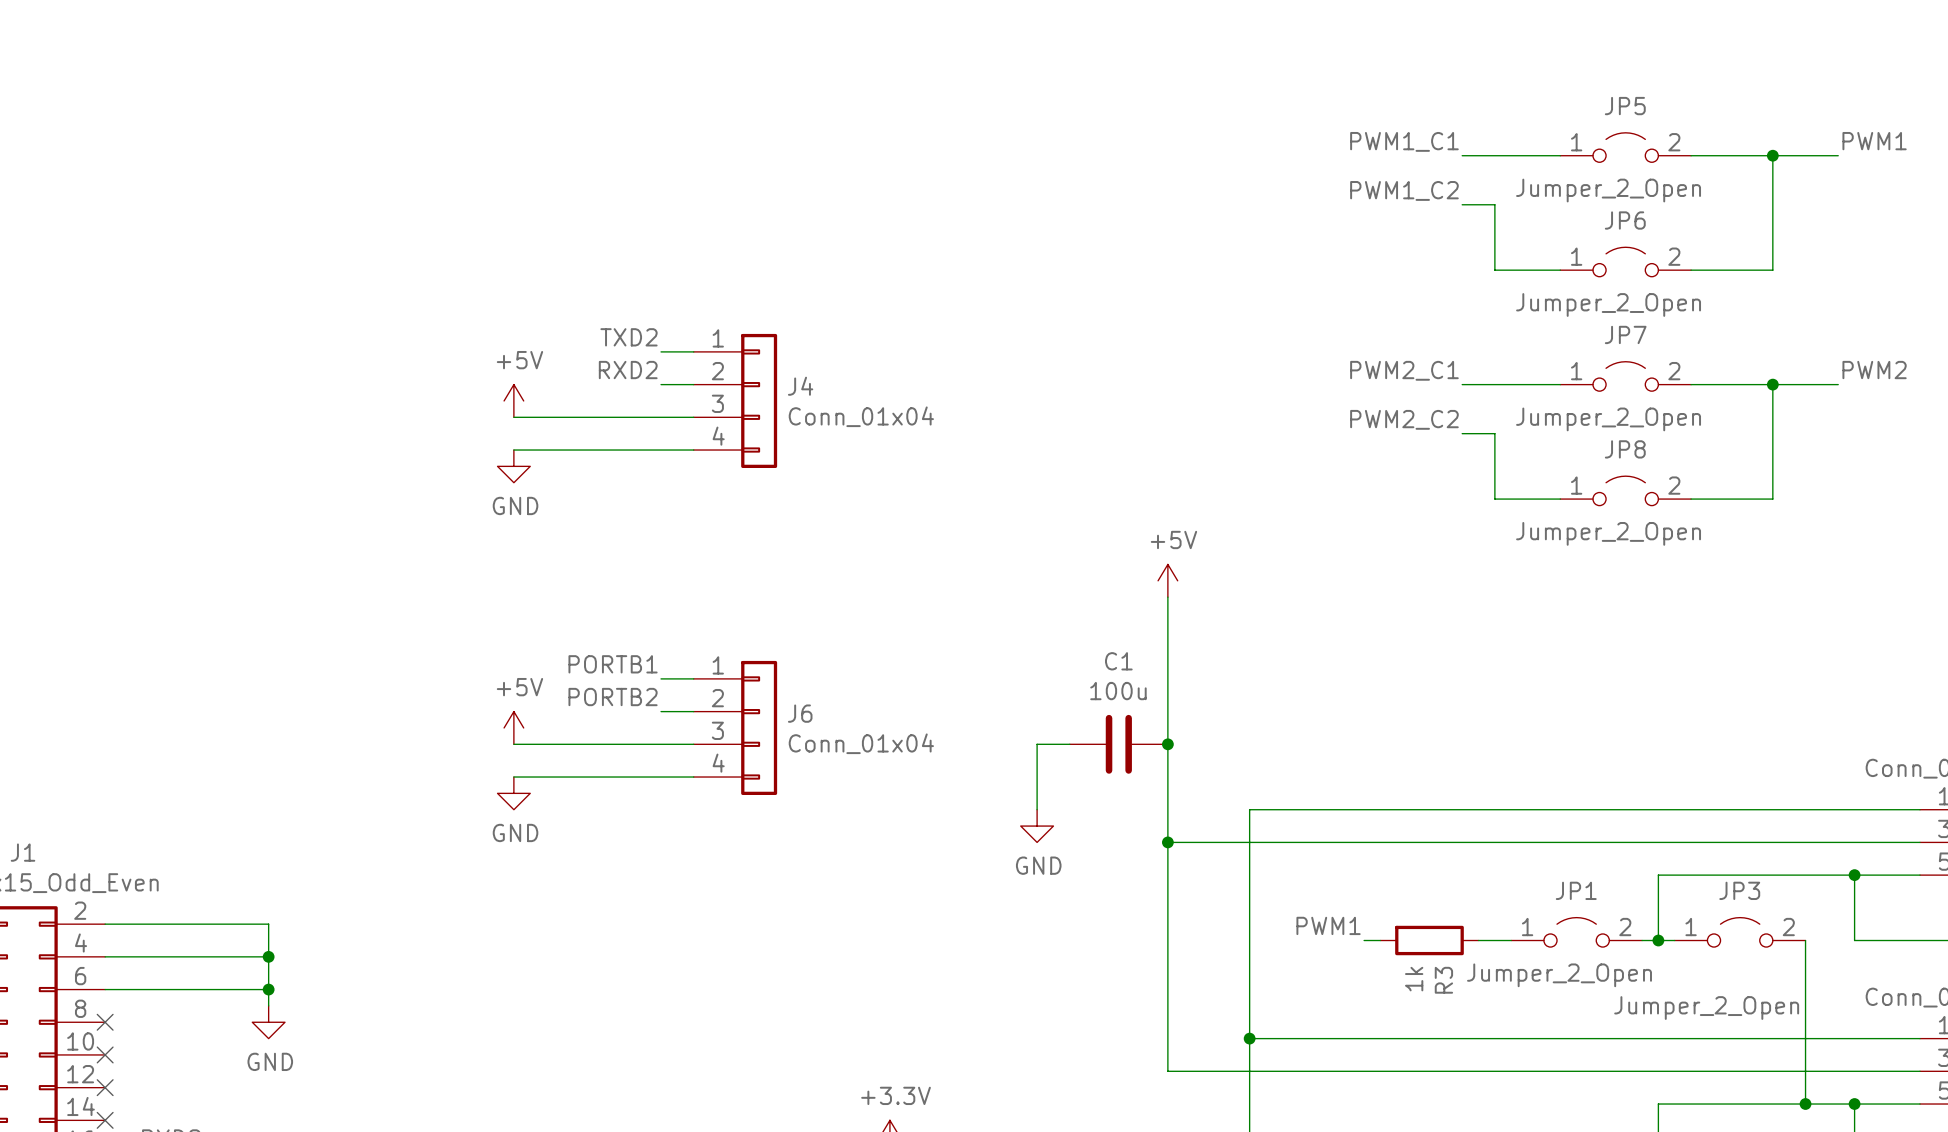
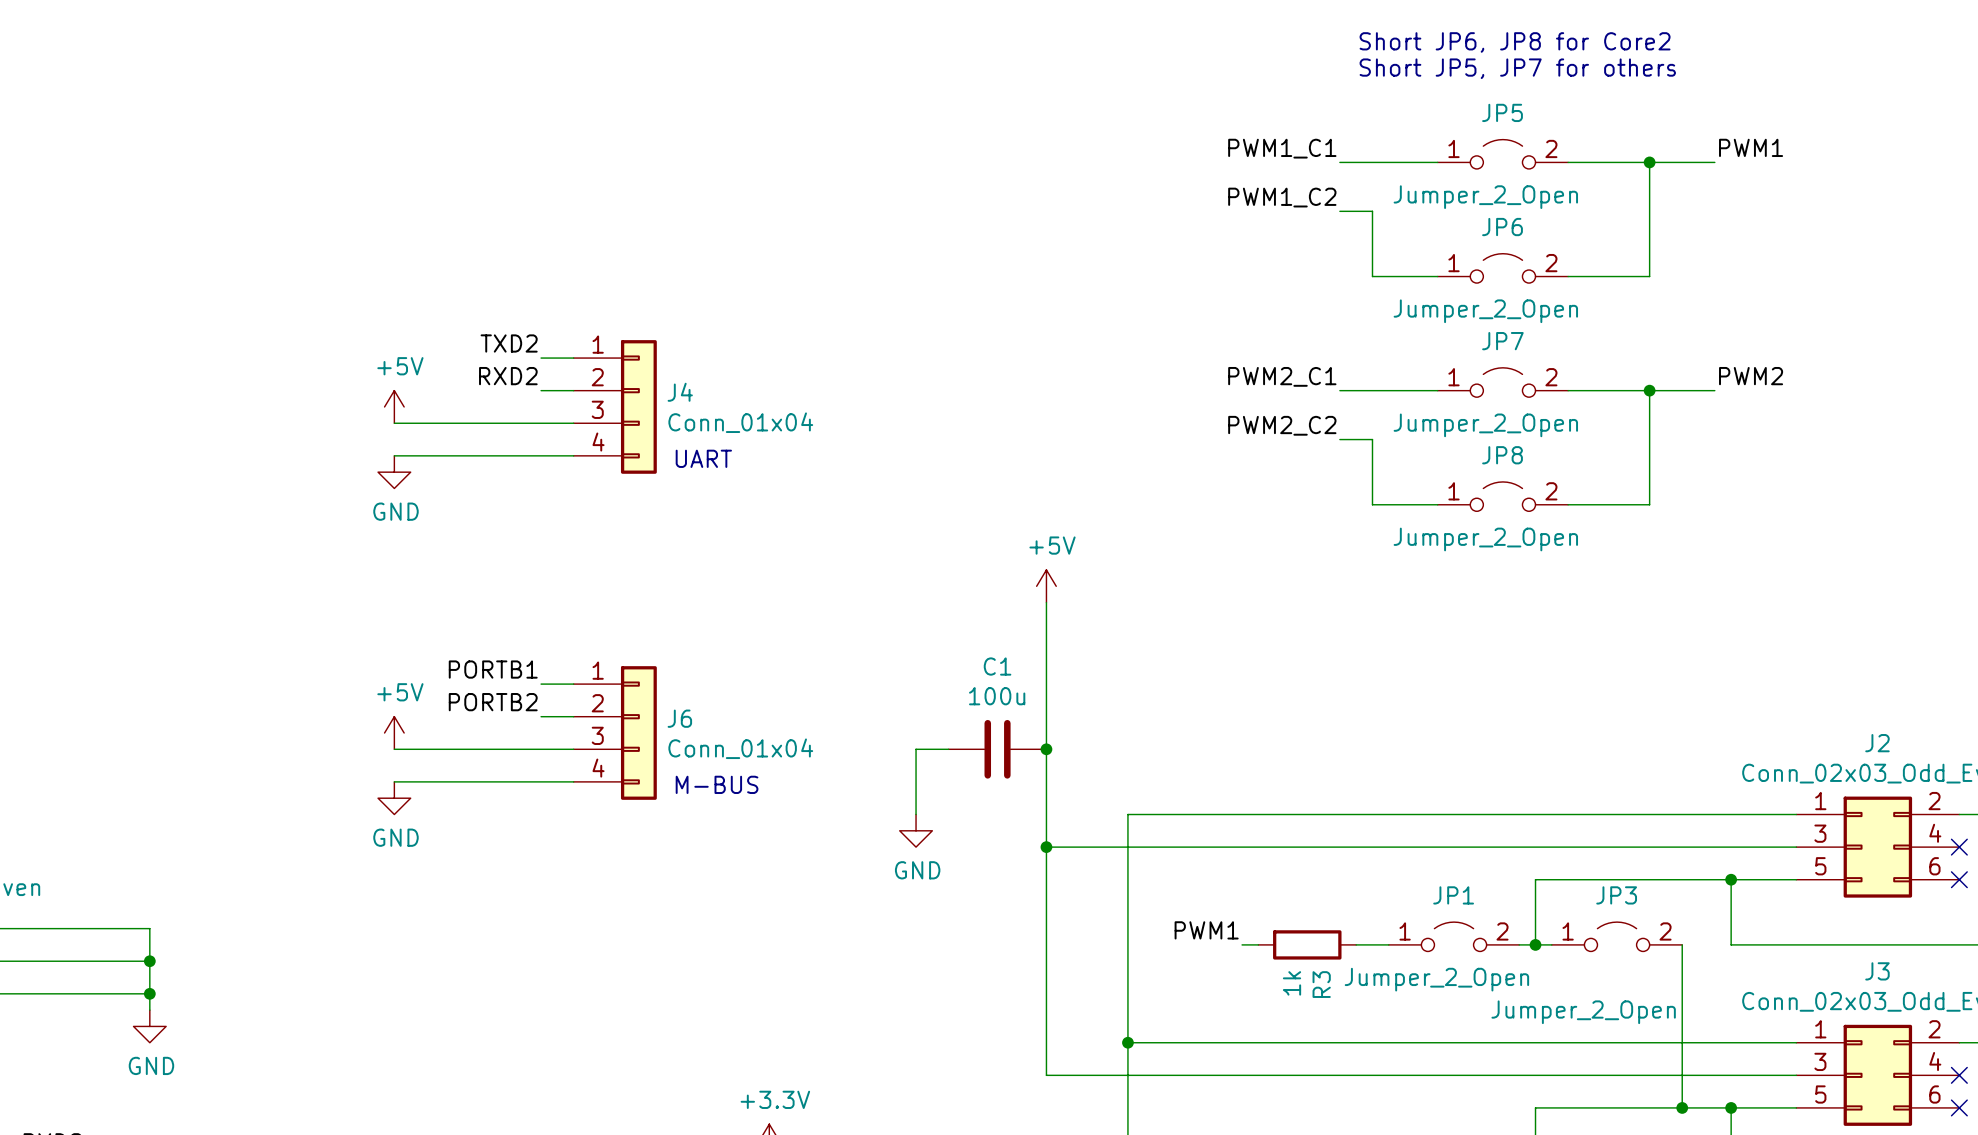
text: none -> Short JP6, JP8 for Core2 (1515, 42)
text: none -> Short JP5, JP7 for others (1517, 68)
text: none -> UART (703, 458)
text: none -> M-BUS (717, 784)

